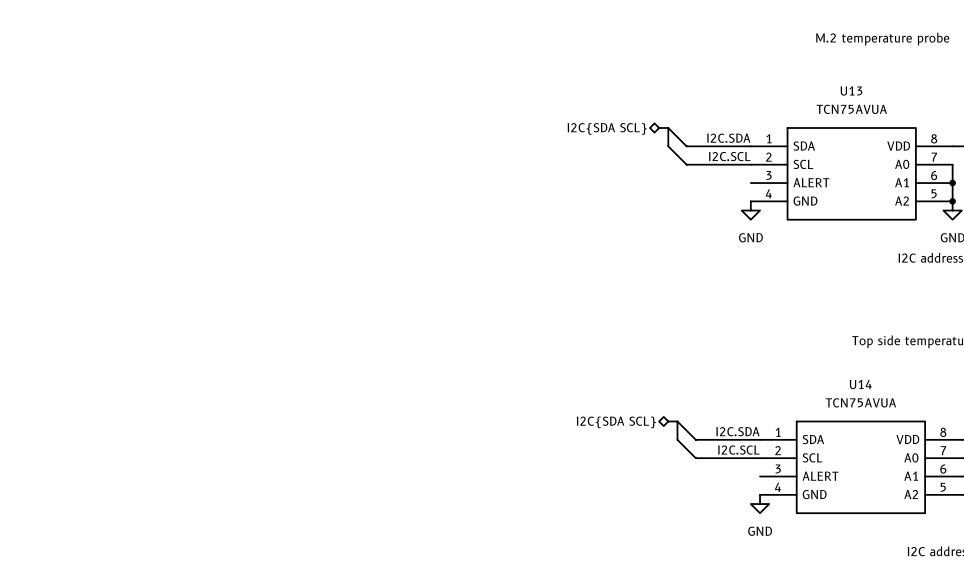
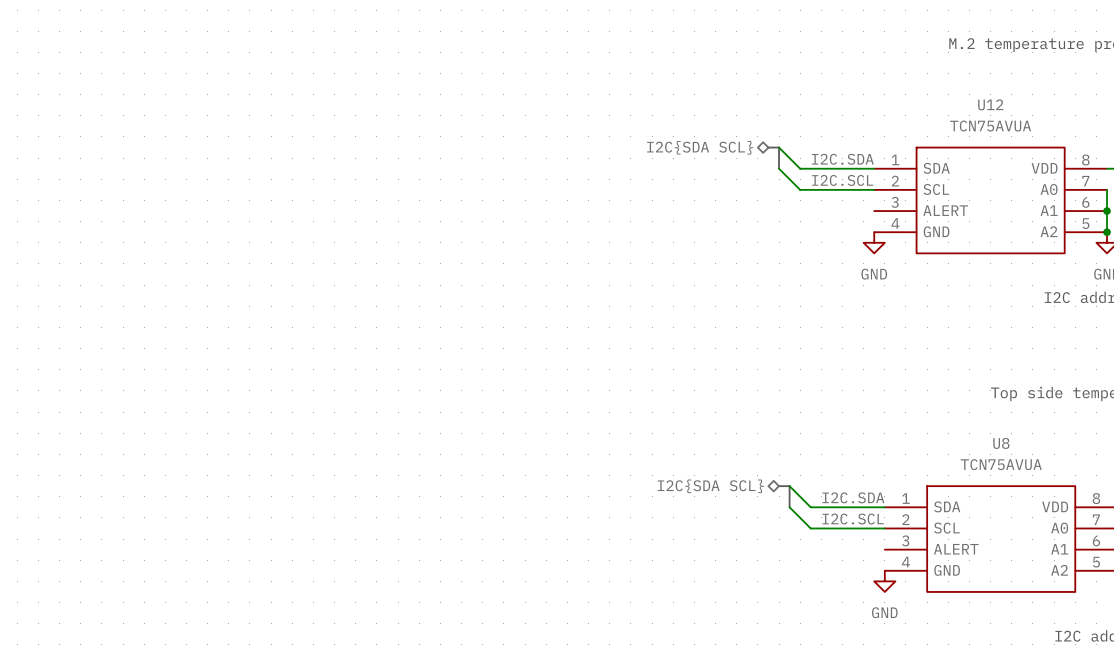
U13 name: U13 (851, 91) -> U12 (990, 104)
U14 name: U14 (860, 384) -> U8 (1001, 443)

